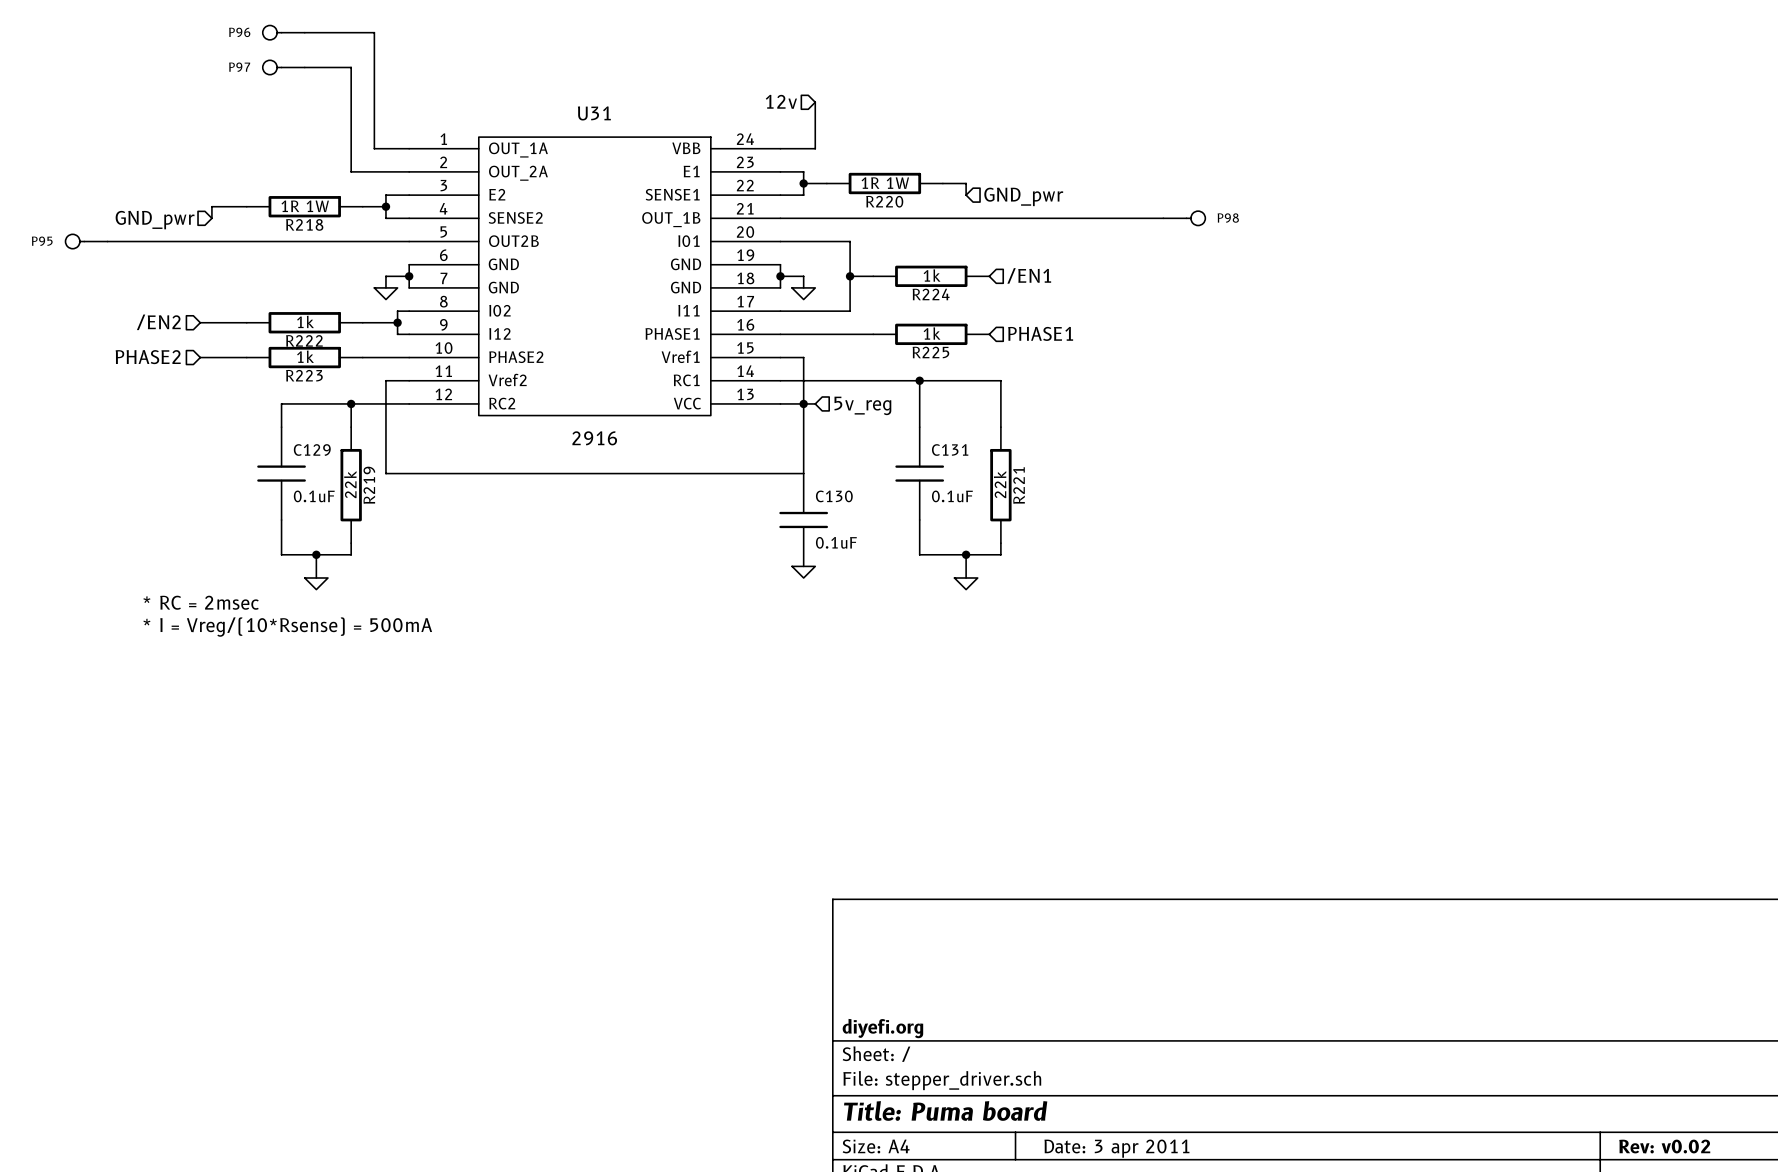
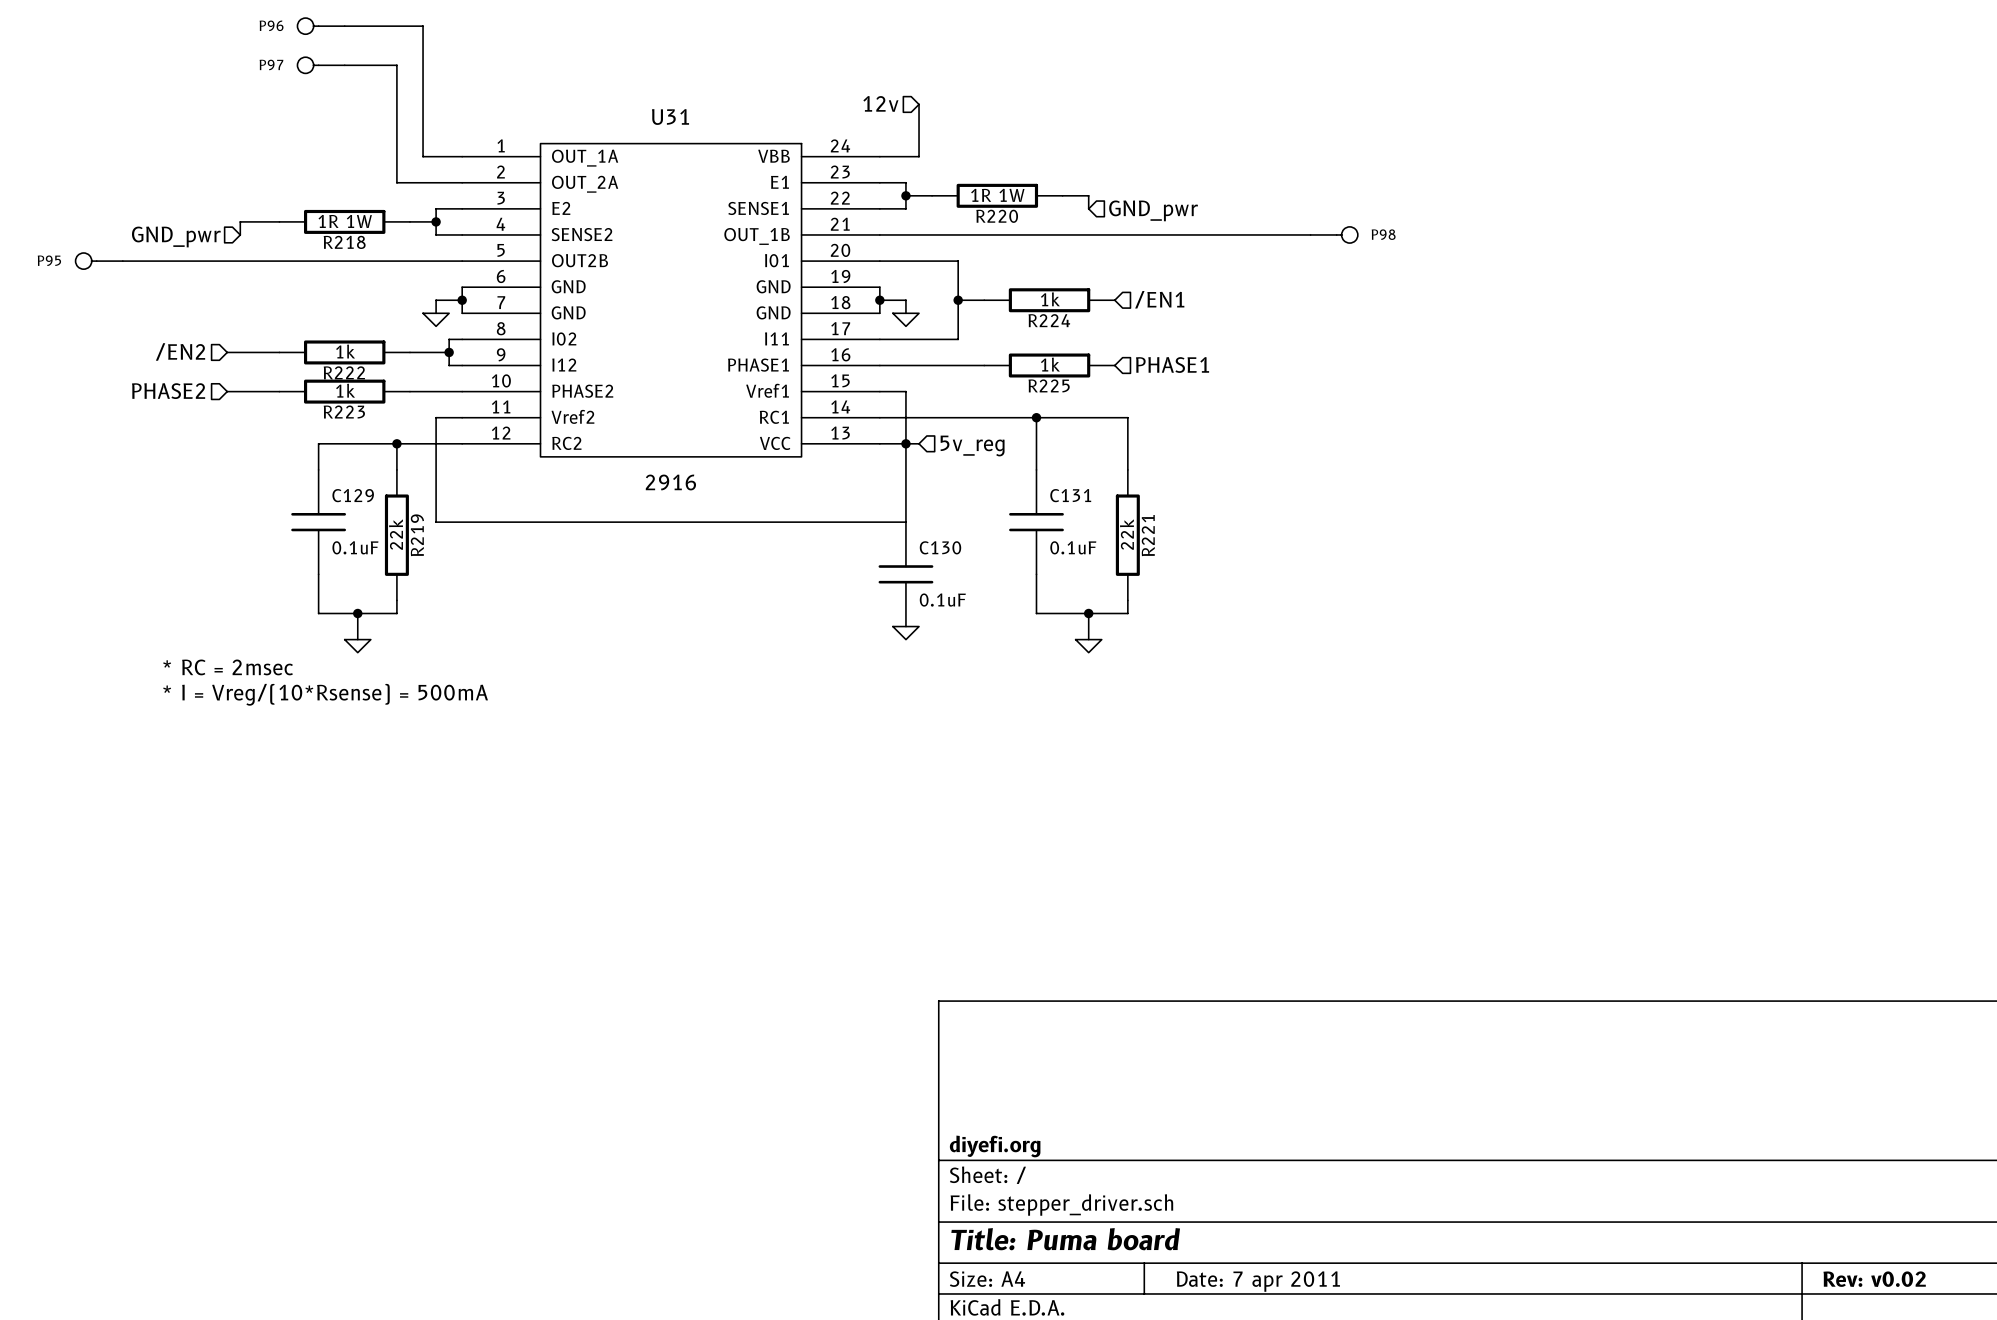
title block: Date: 3 apr 2011 (1116, 1148) -> Date: 7 apr 2011 (1258, 1281)

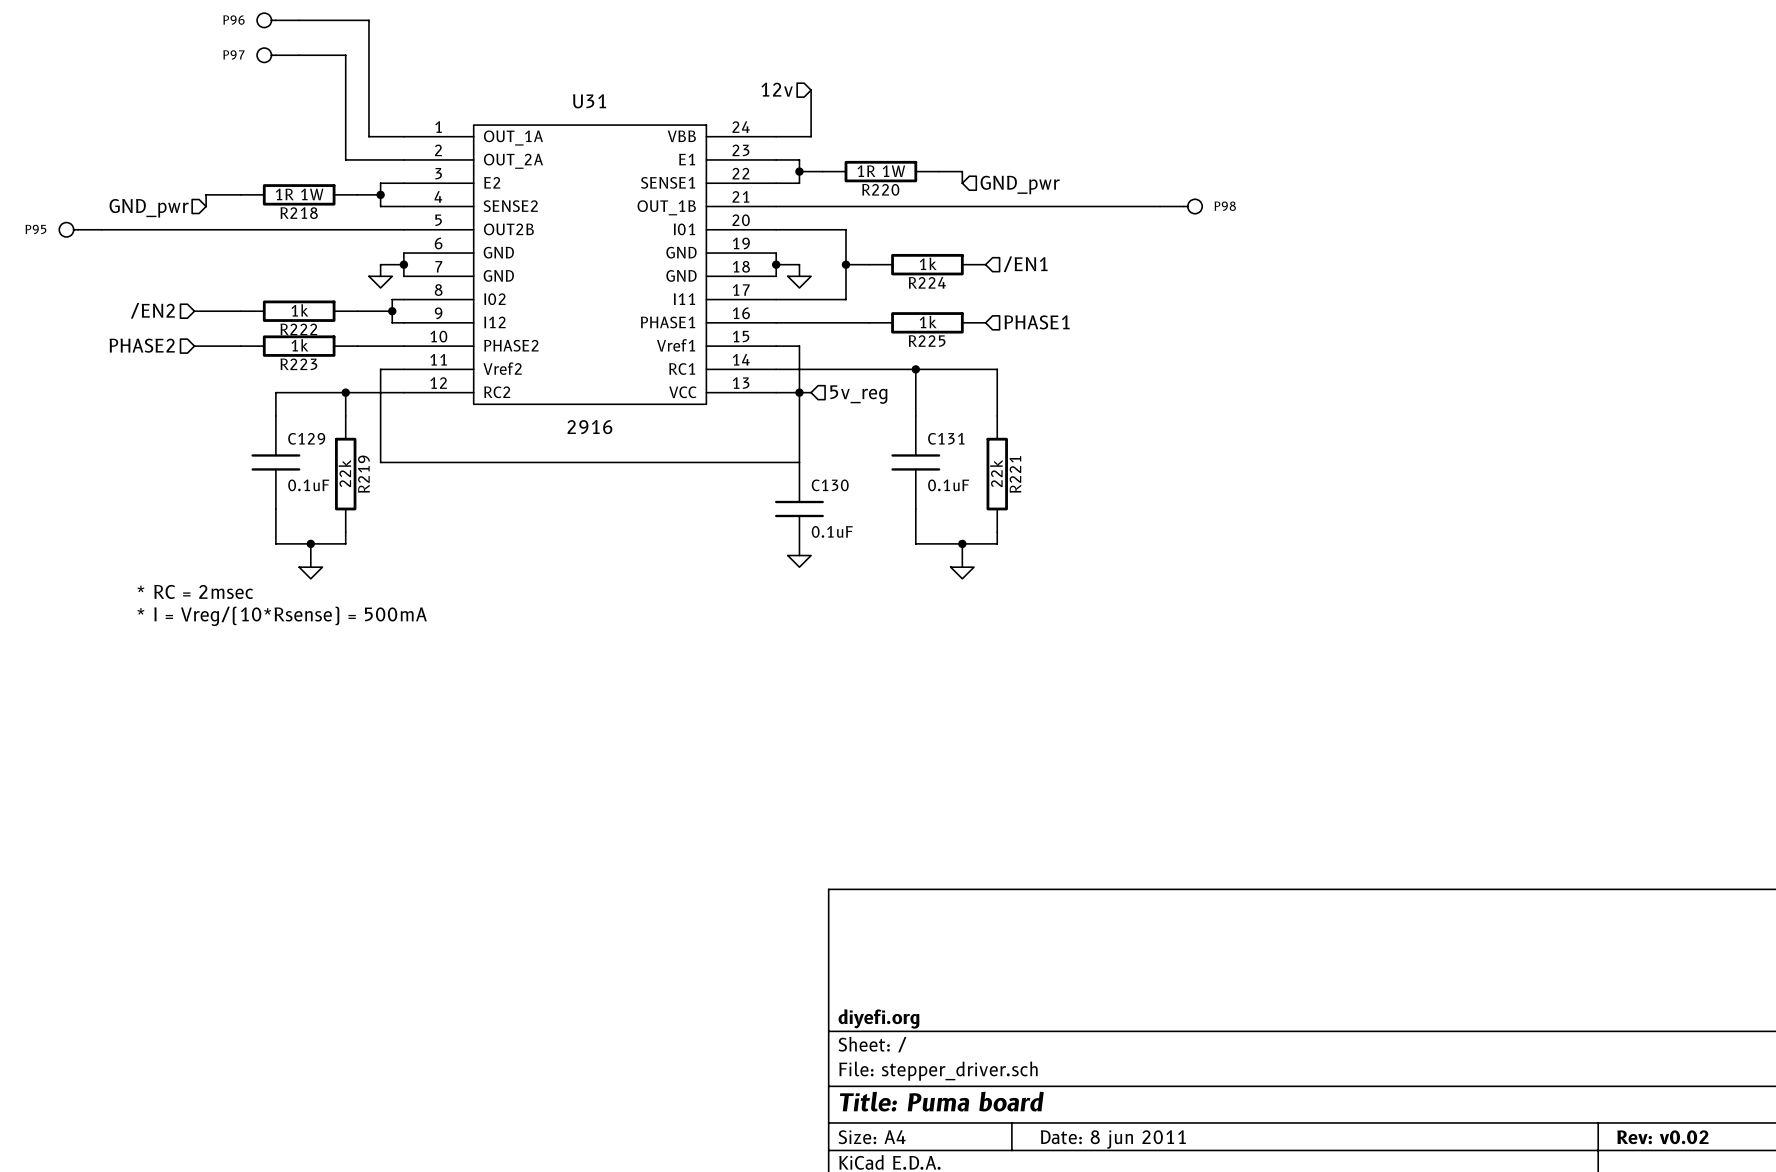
title block: Date: 7 apr 2011 (1258, 1281) -> Date: 8 jun 2011 (1113, 1139)

